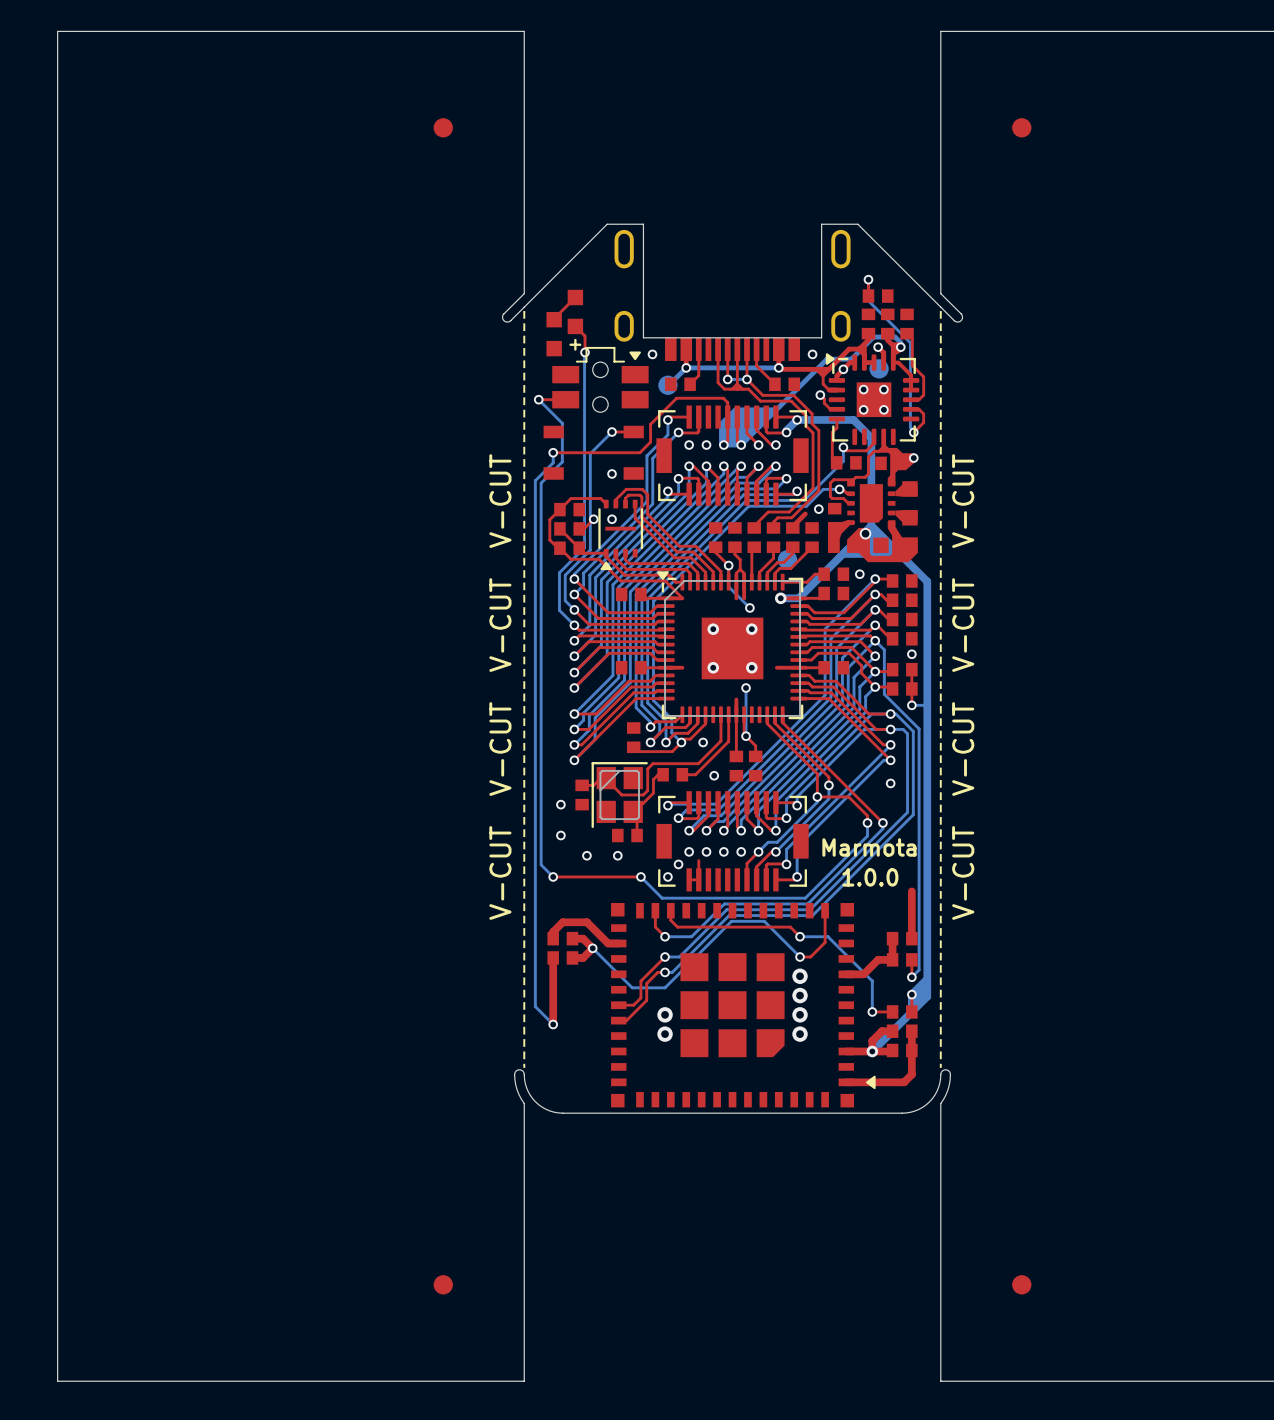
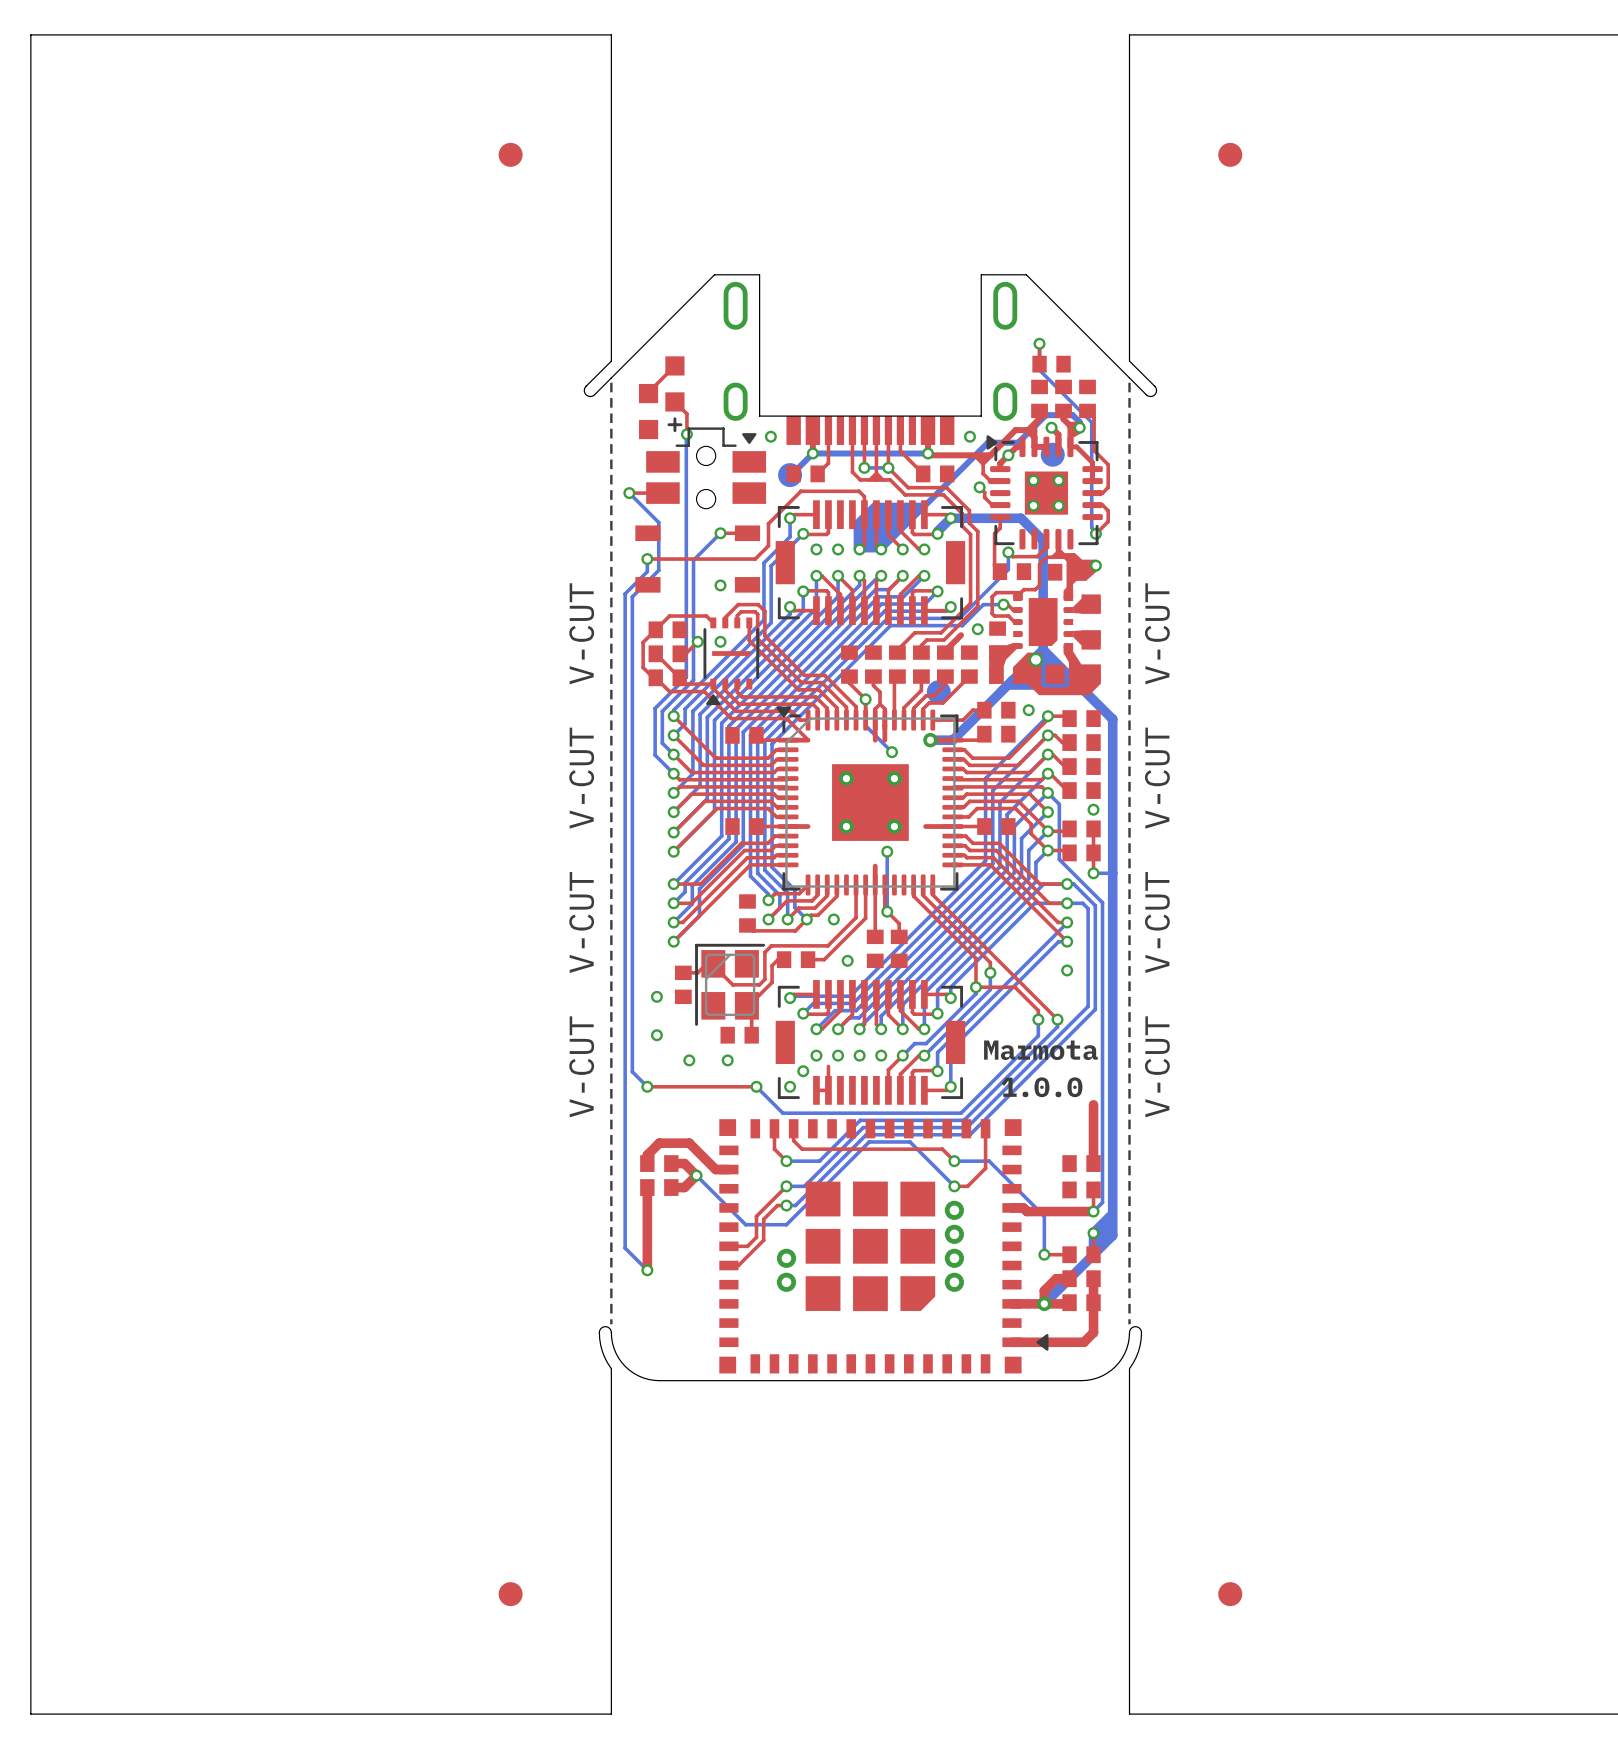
top track: (892, 938) (892, 959) (878, 959) (863, 974) (855, 974) -> (1093, 1211) (1026, 1211) (1023, 1207)

